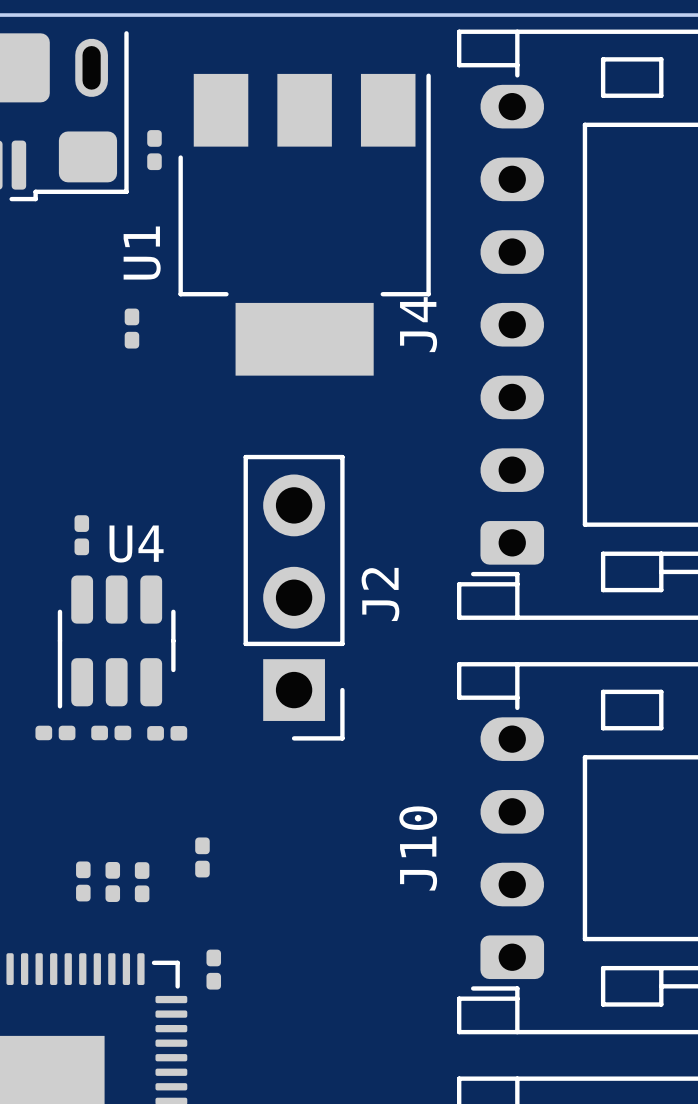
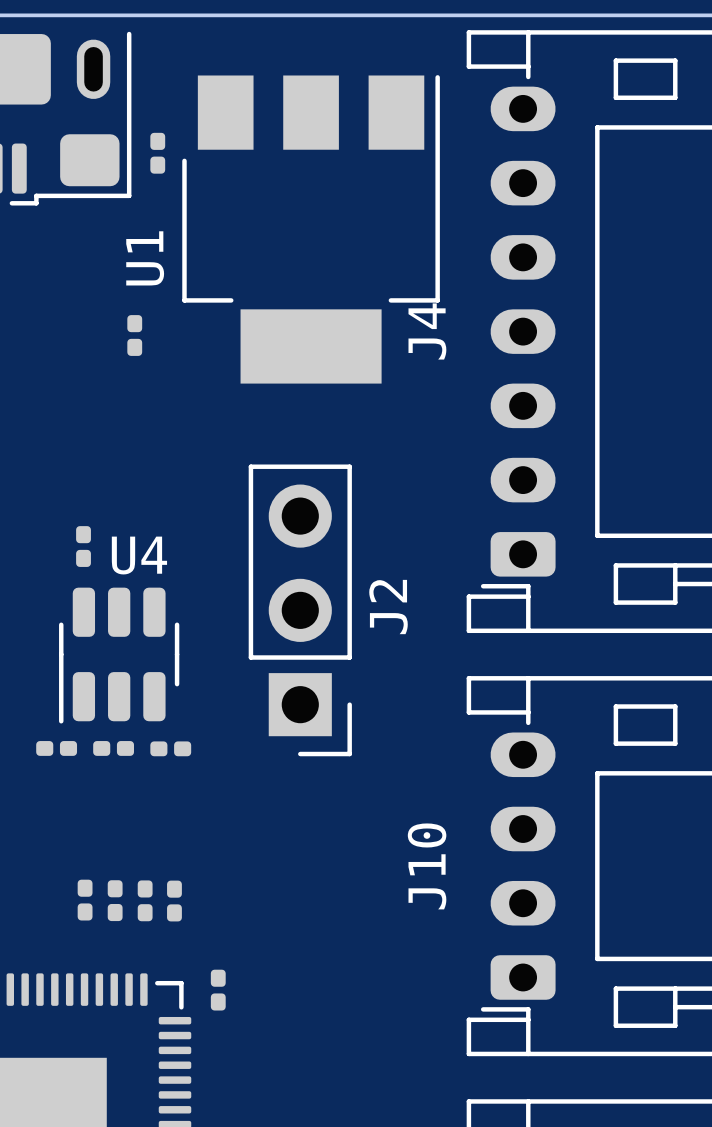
part position: (202, 857) -> (174, 901)

